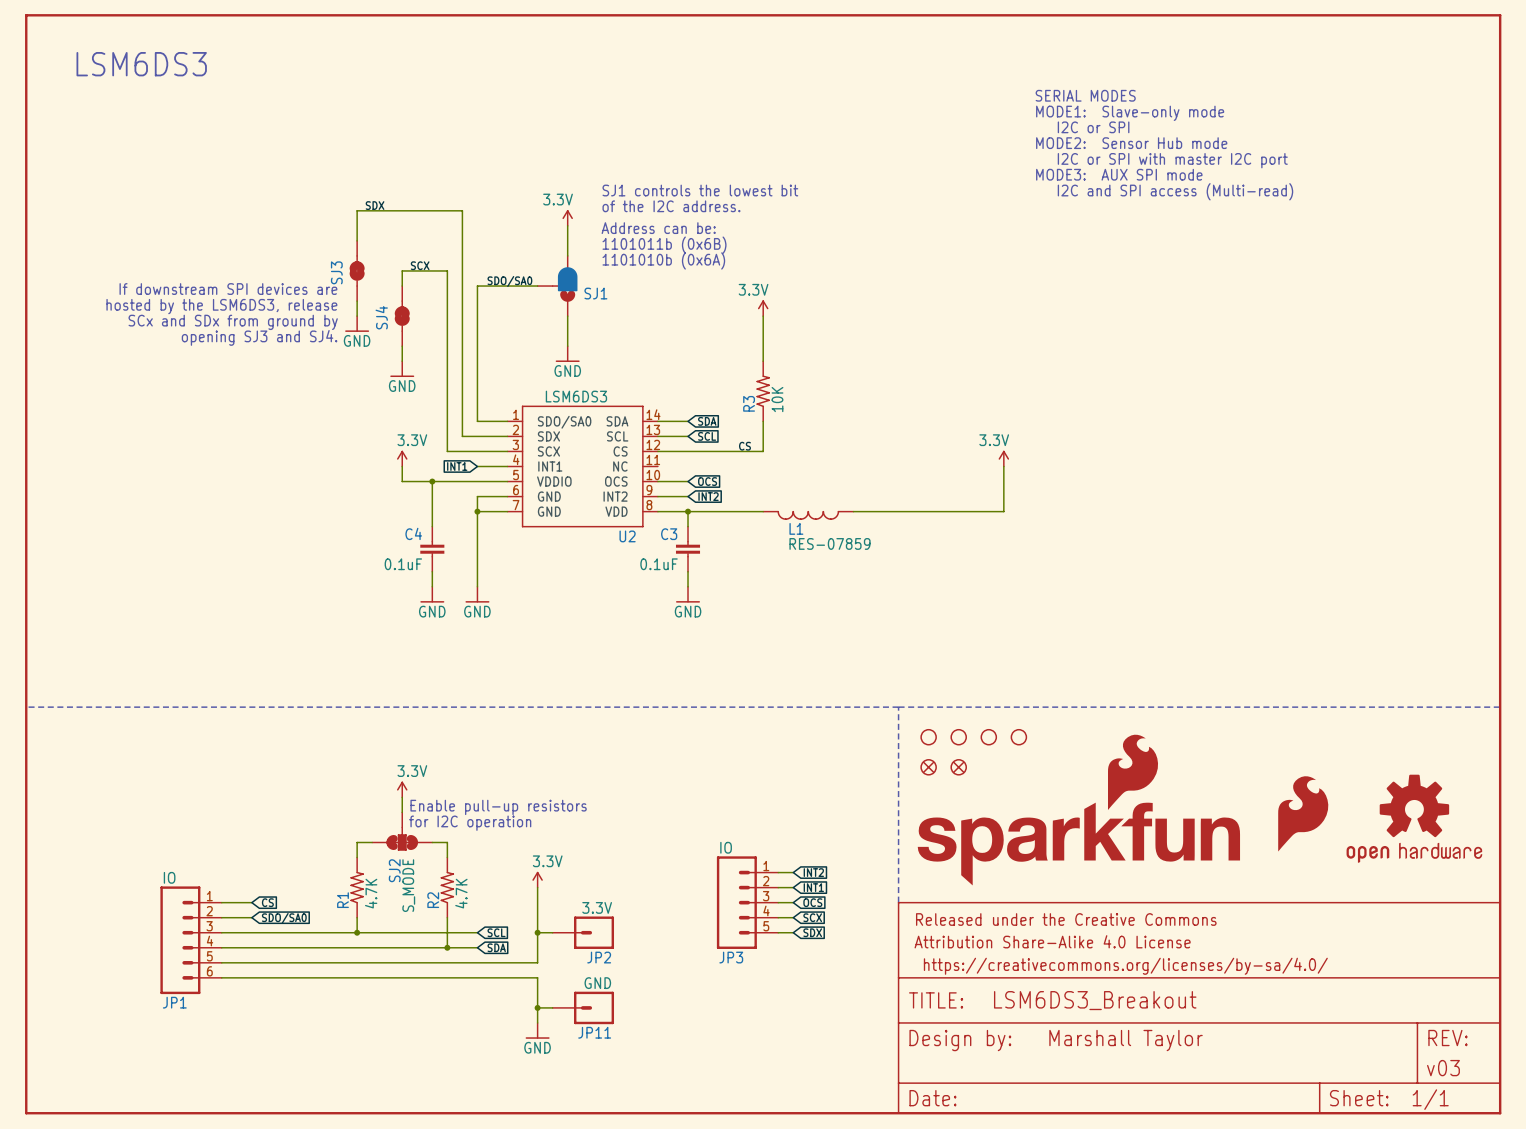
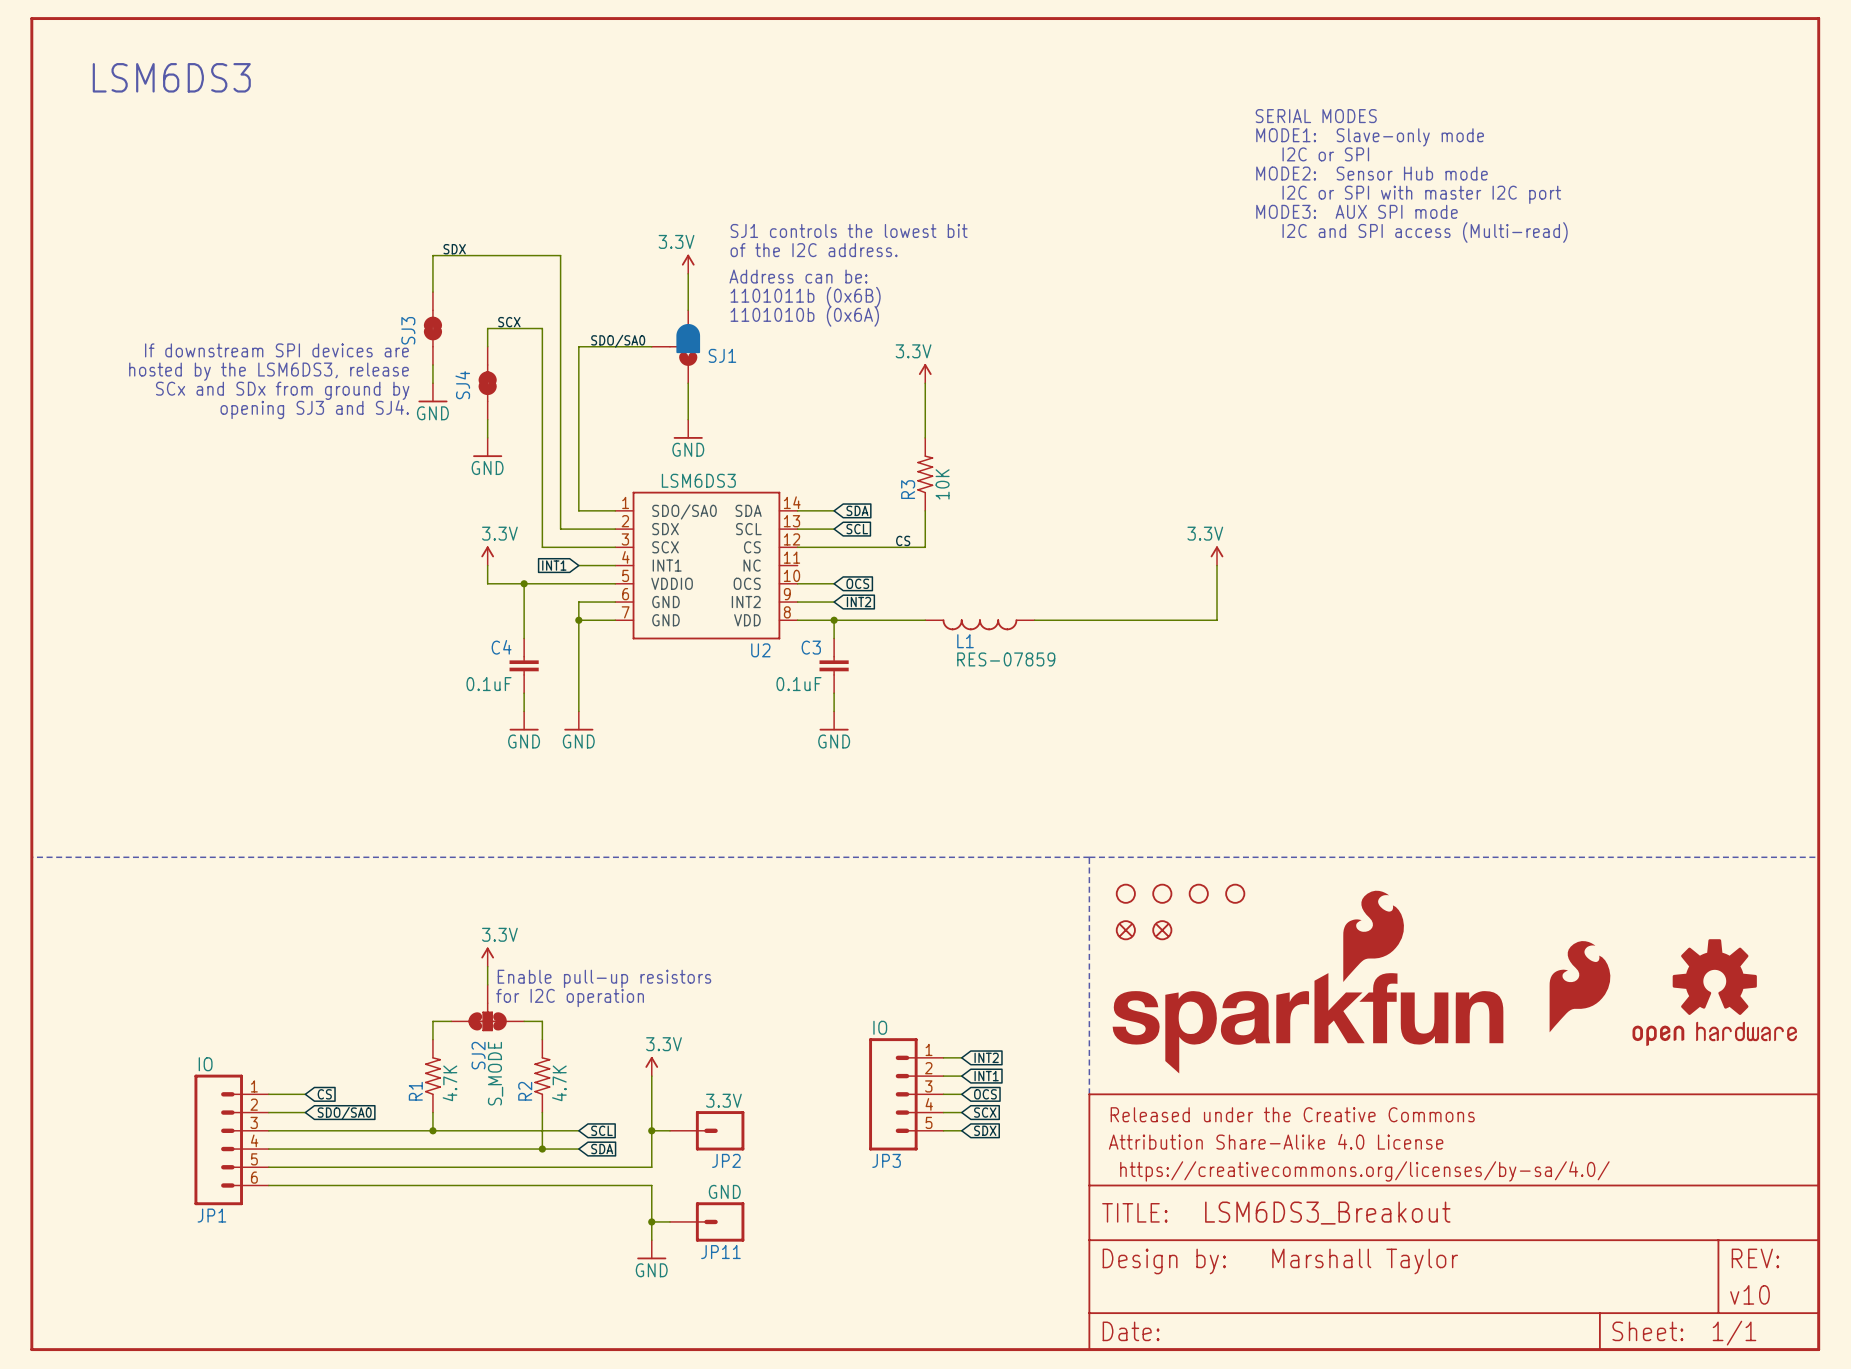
part text: v03 (1443, 1068) -> v10 (1749, 1294)

